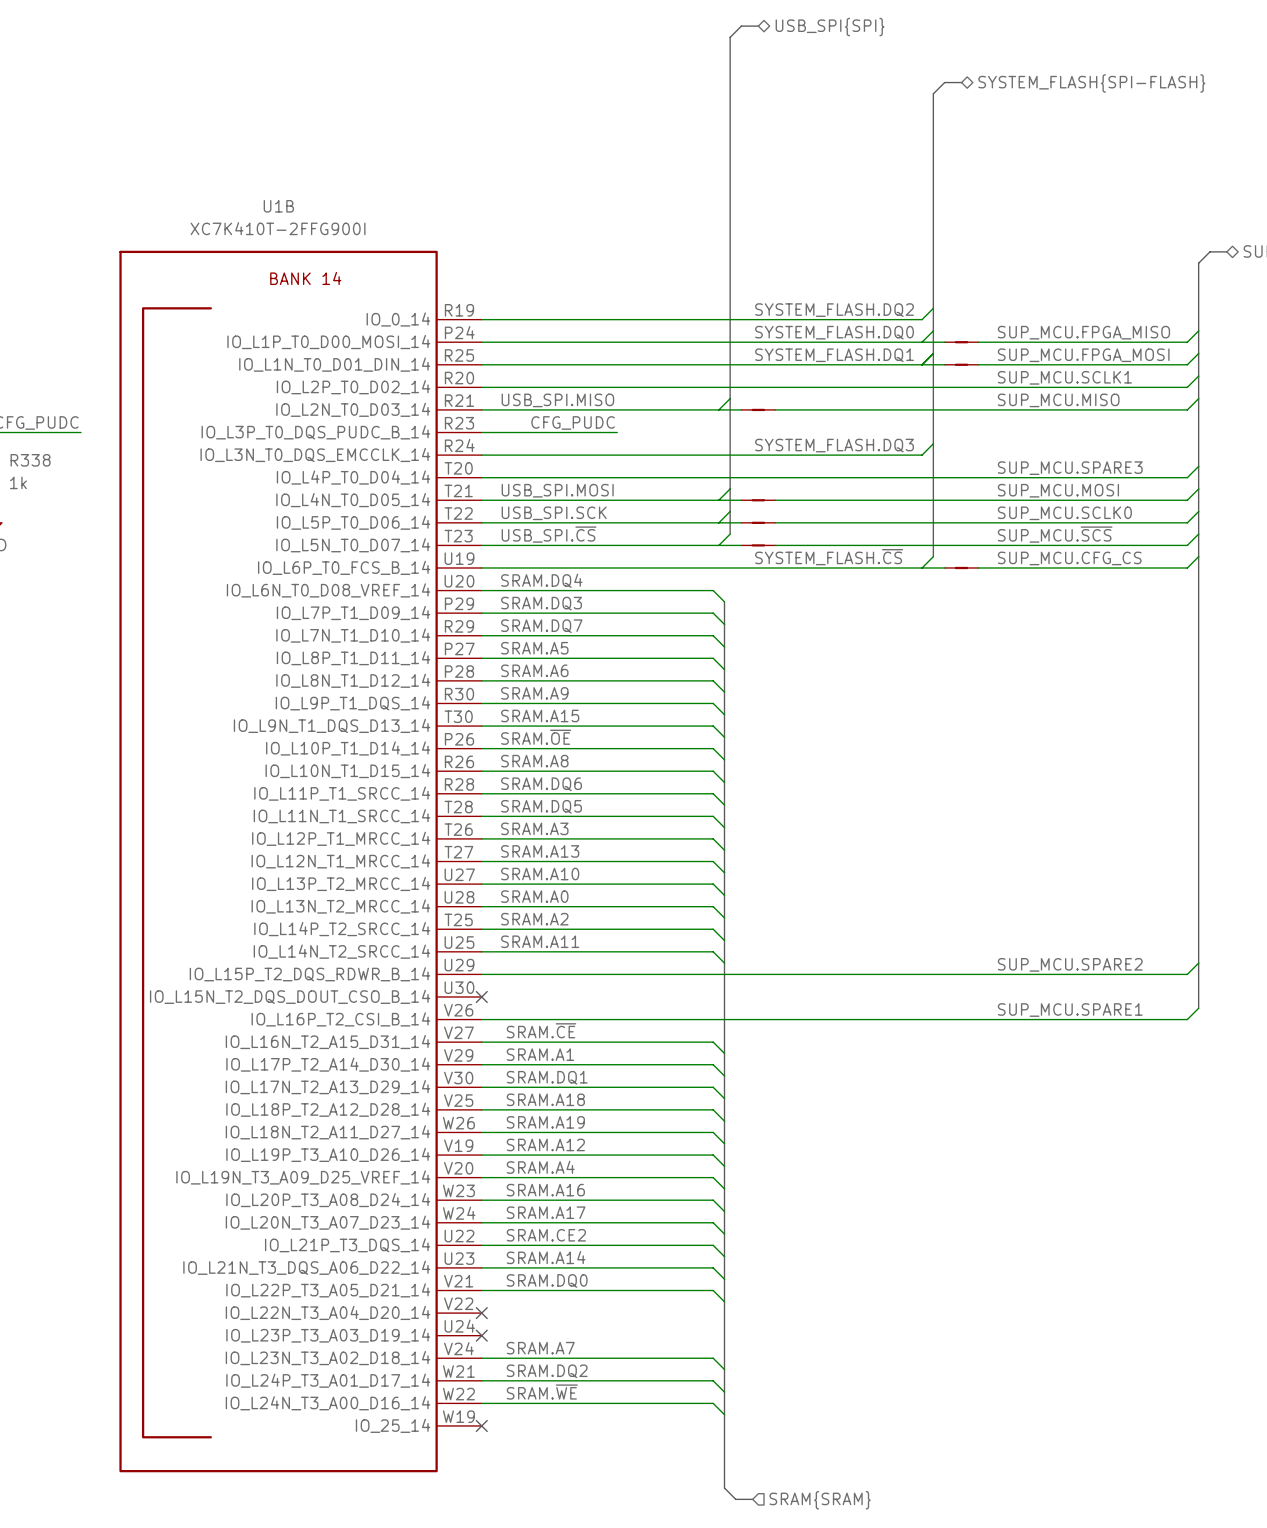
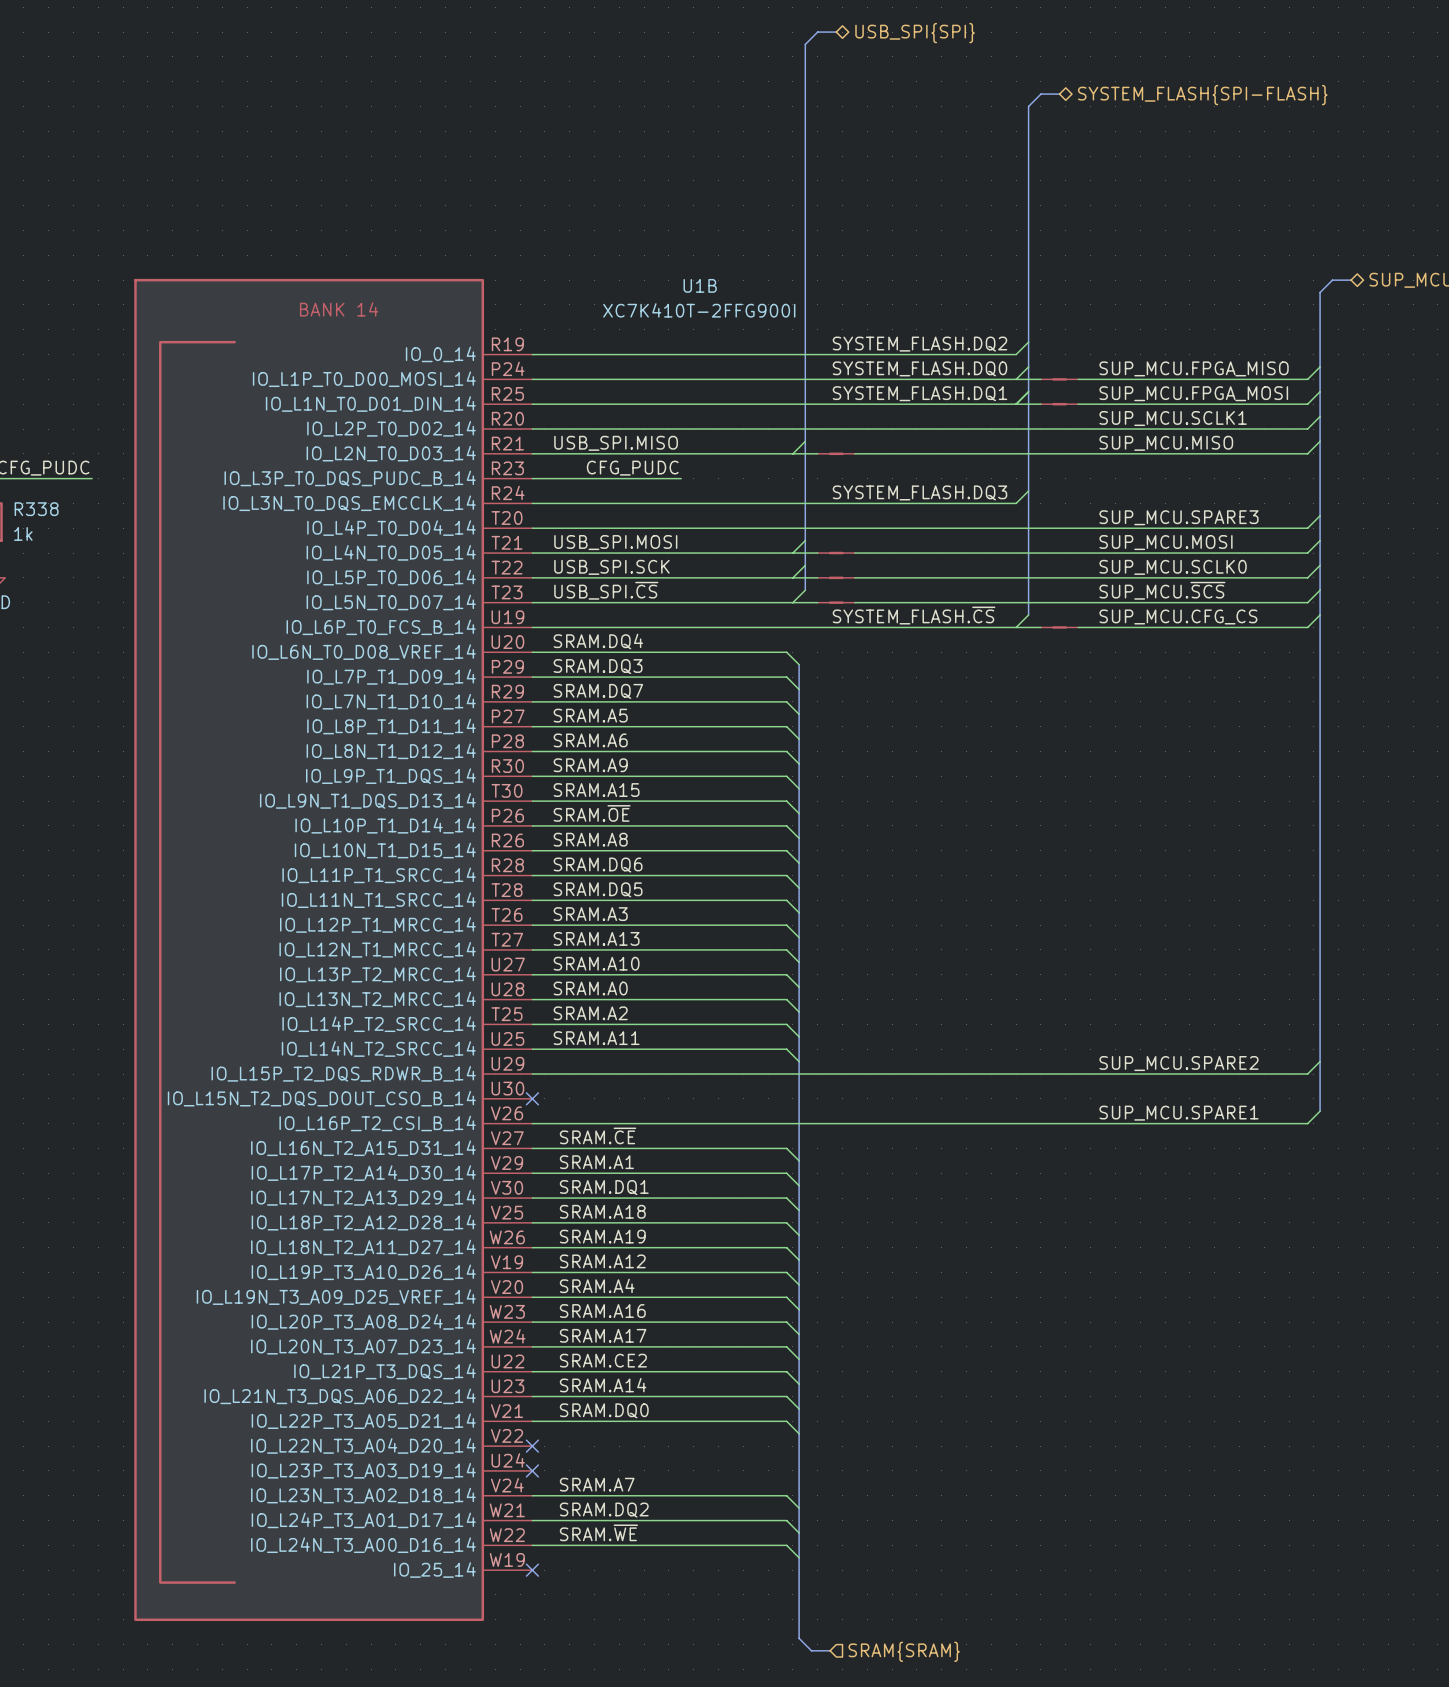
U1B name position: U1B (278, 206) -> U1B (700, 285)
U1B value position: XC7K410T-2FFG900I (278, 228) -> XC7K410T-2FFG900I (699, 310)

